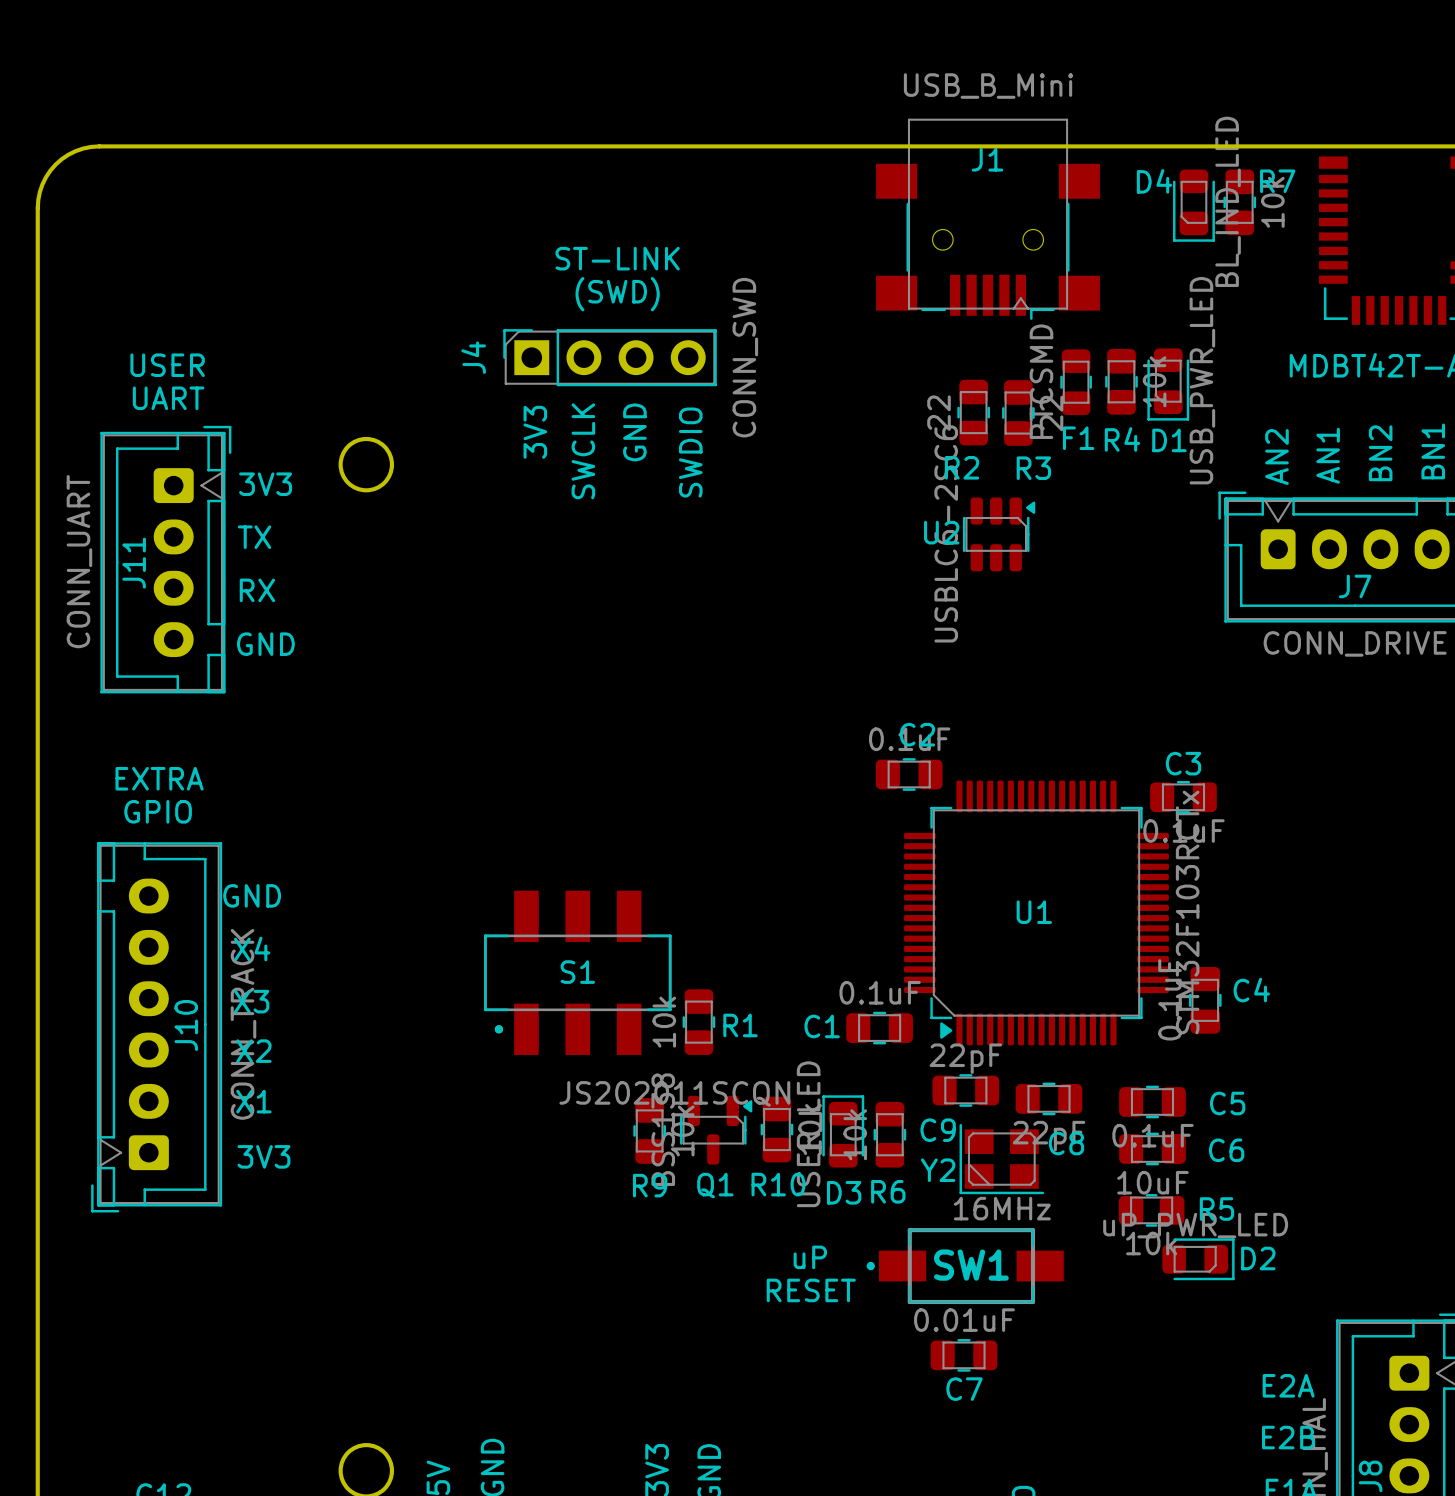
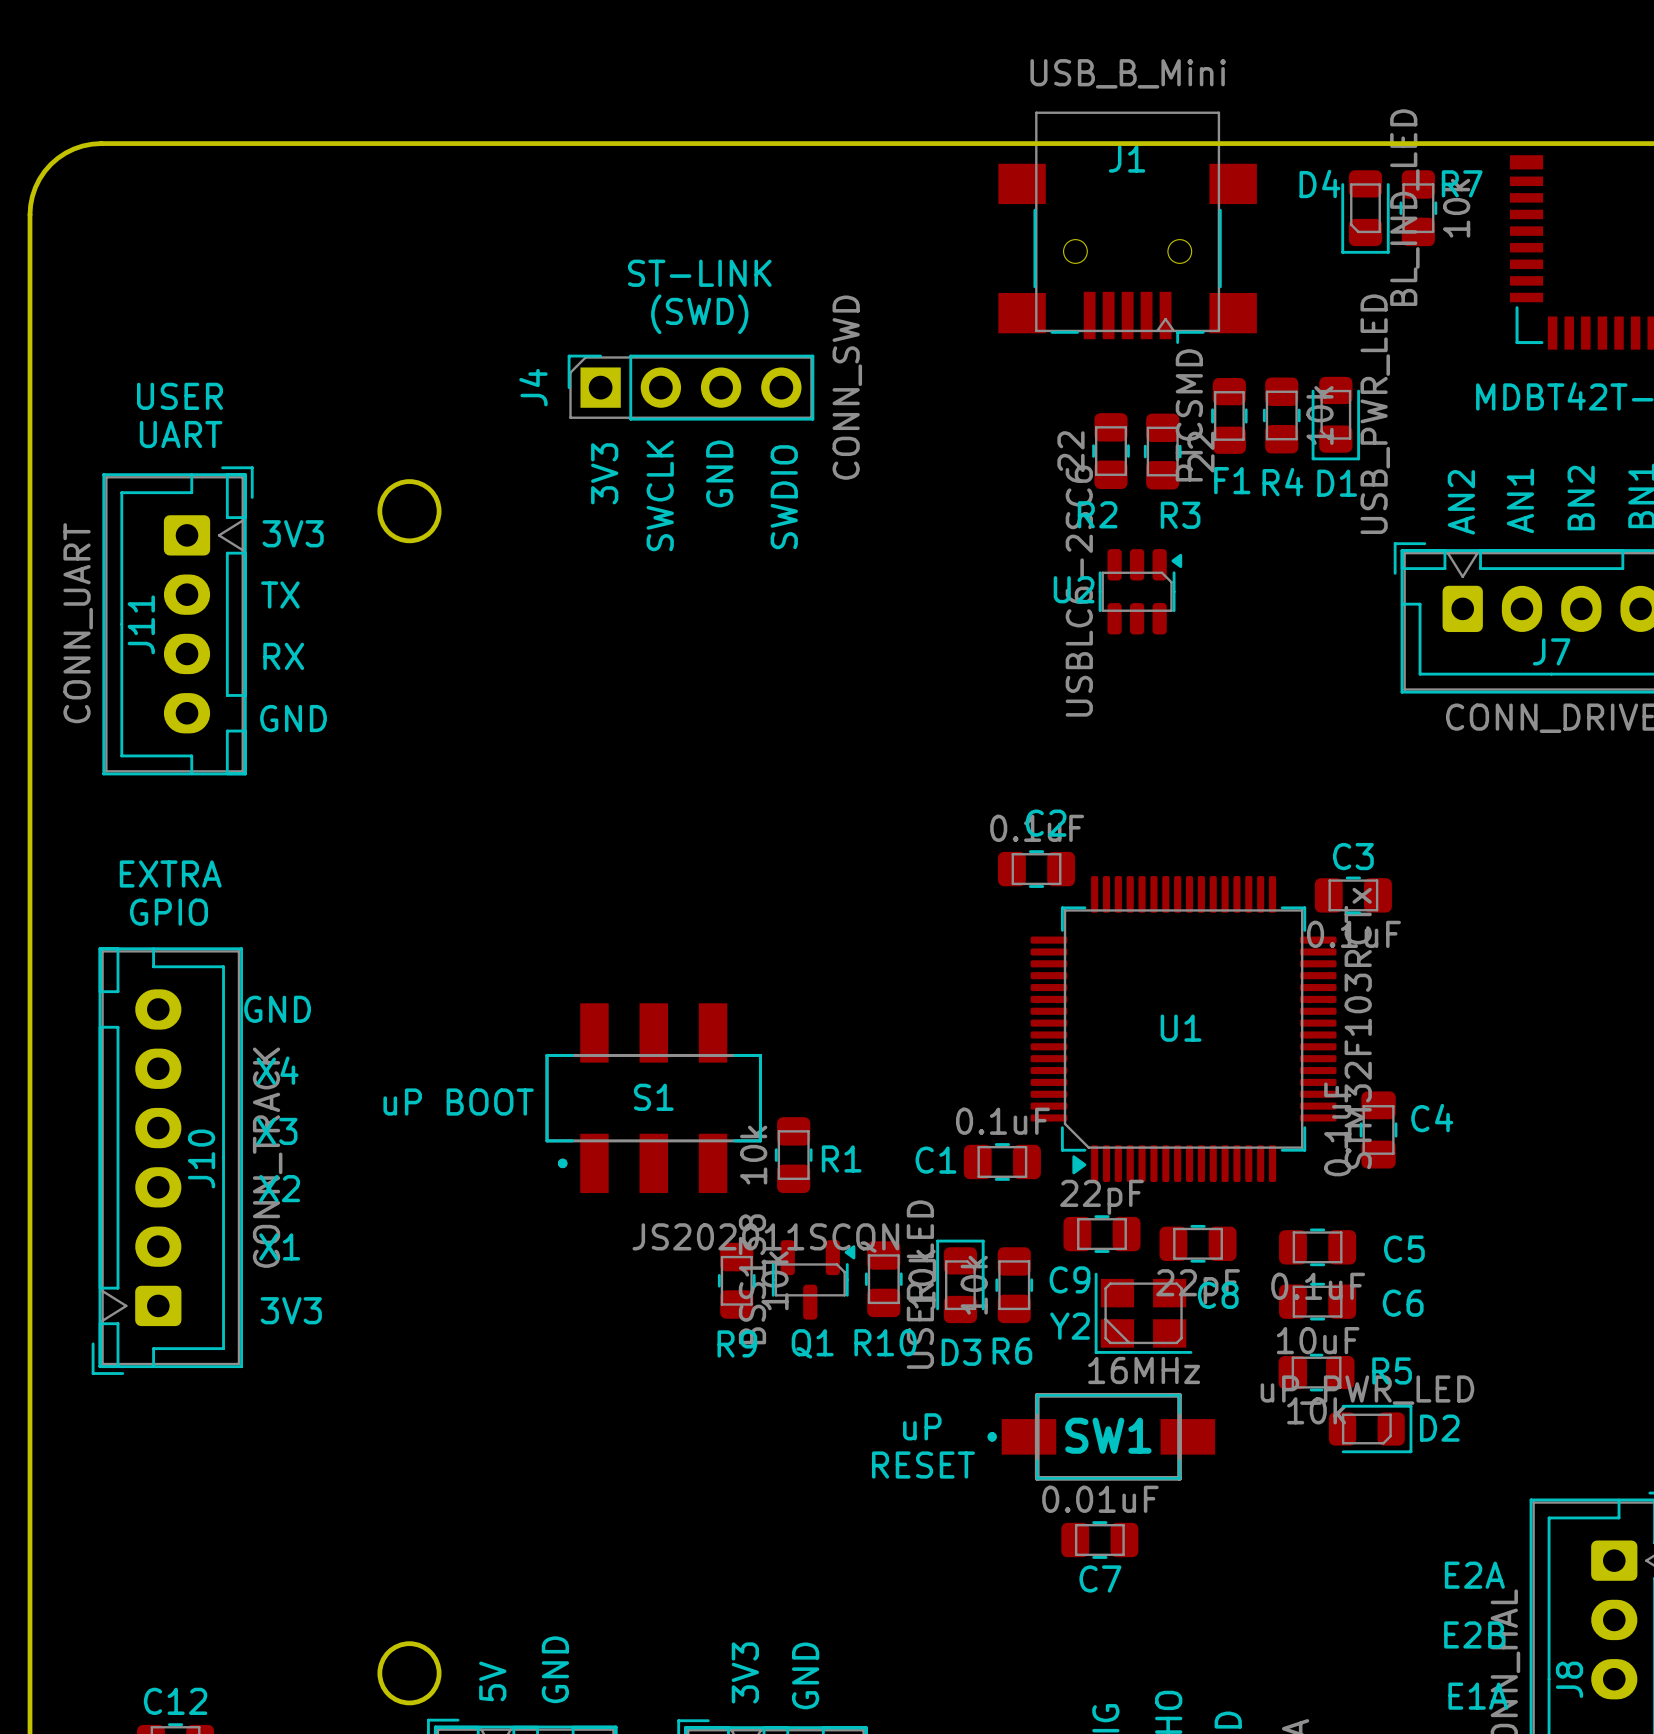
text: none -> uP BOOT (458, 1102)

